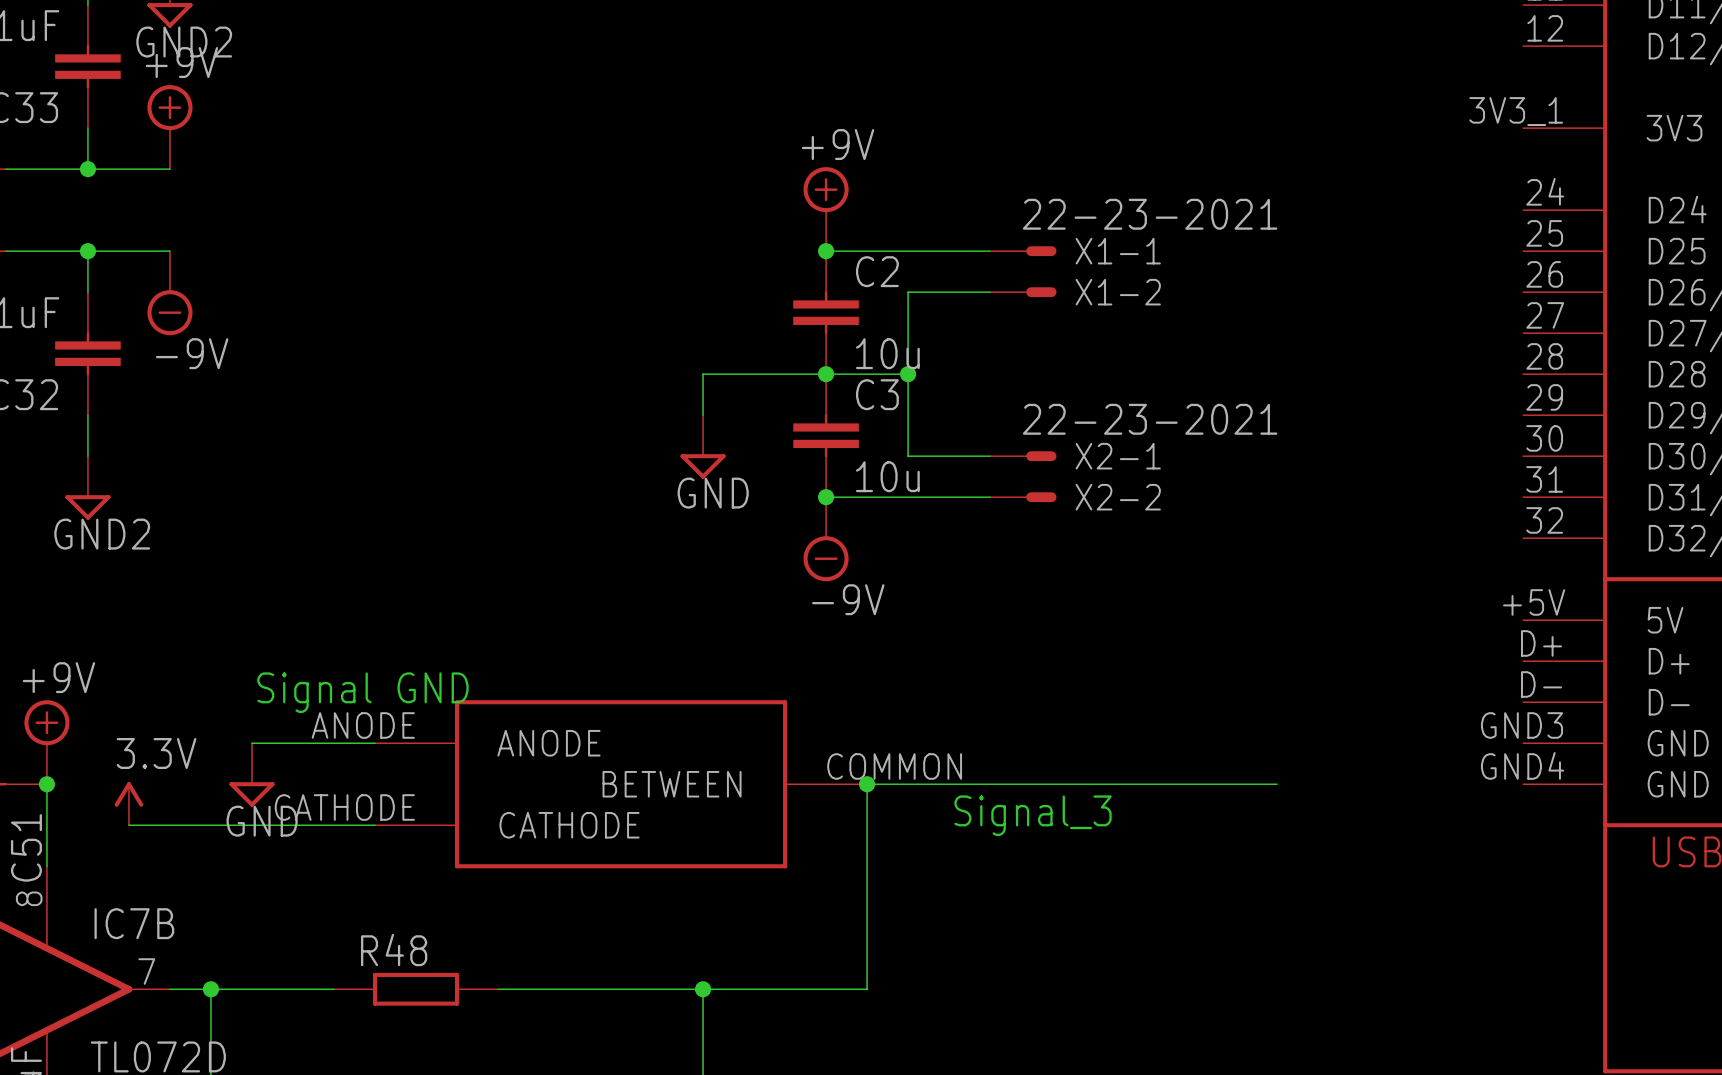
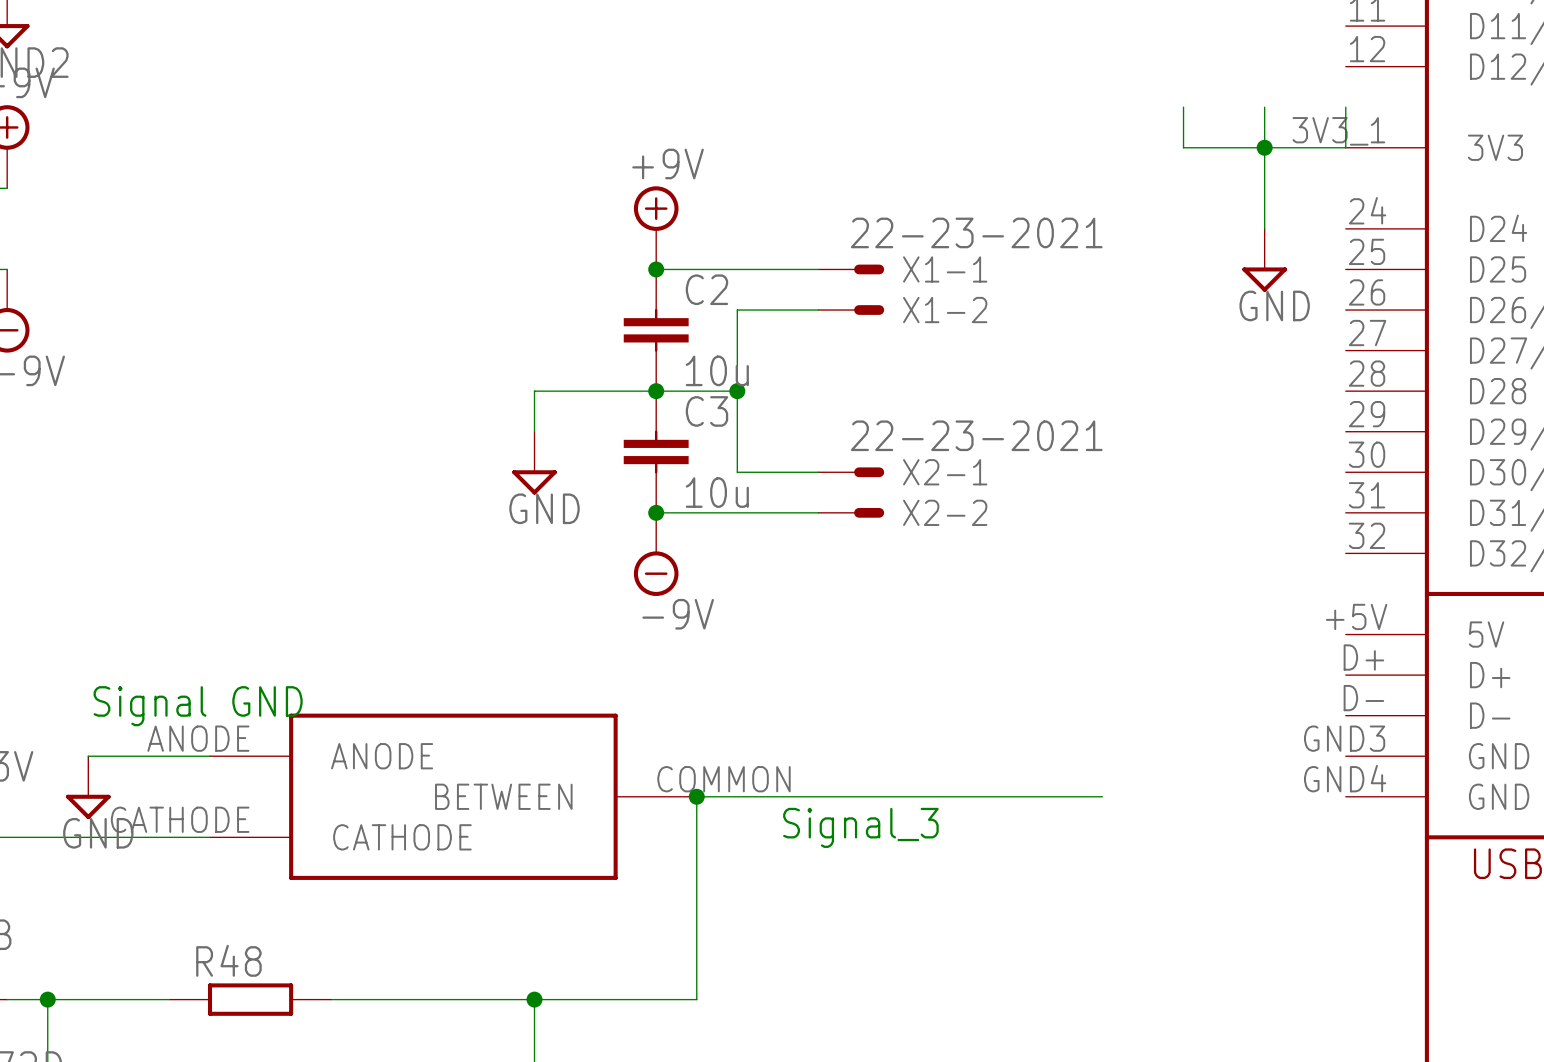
wire: none -> (1183, 107) (1183, 147) (1345, 147) (1345, 107)
wire: none -> (1264, 107) (1264, 228)
junction: none -> (1264, 147)
power symbol: none -> GND (1264, 260)

